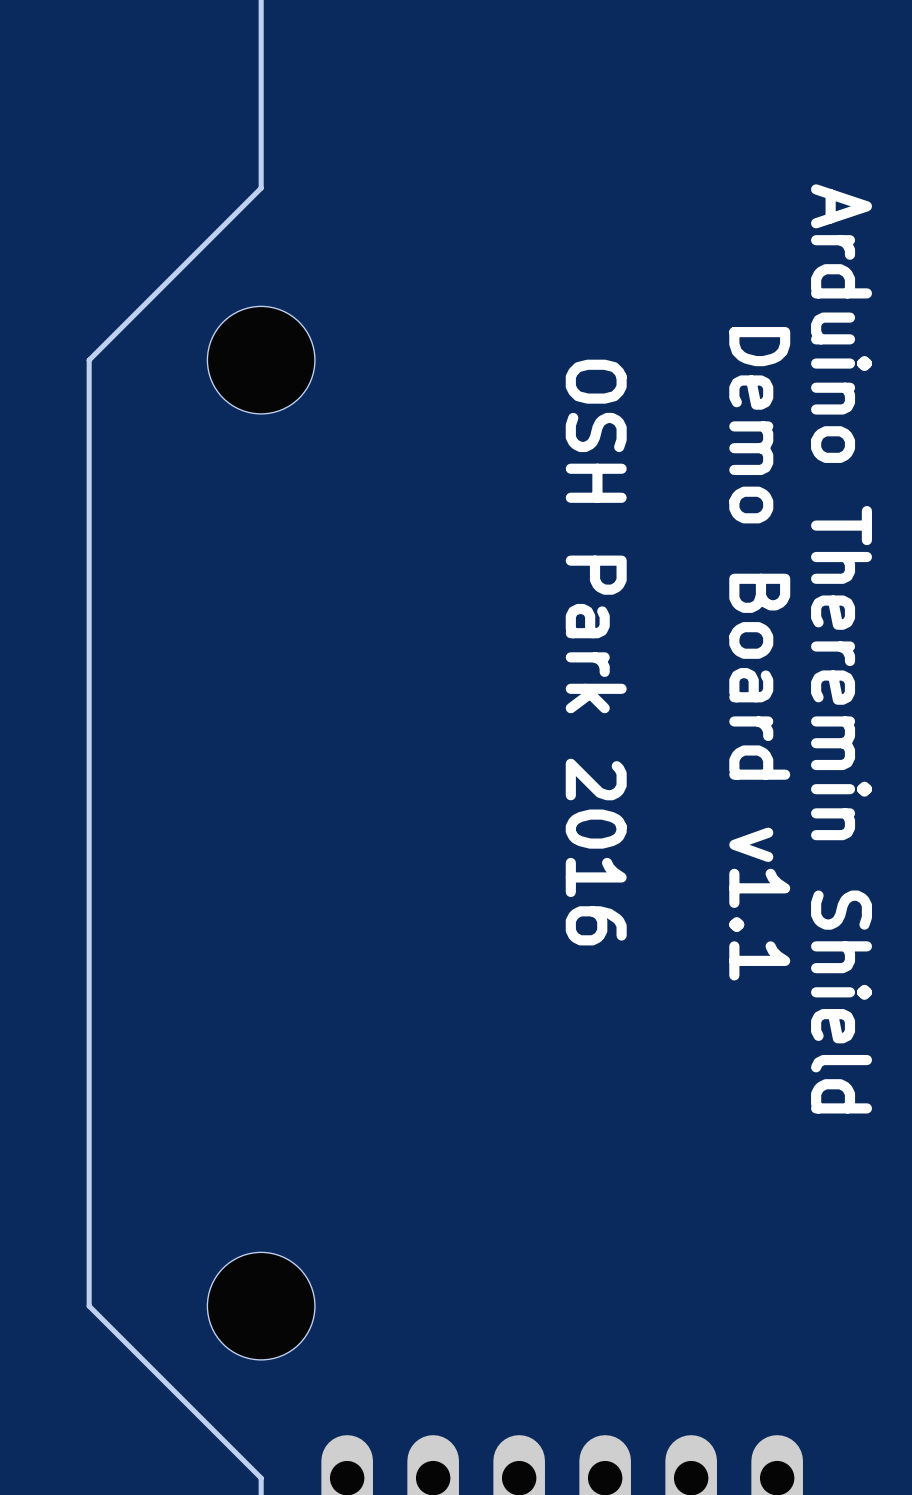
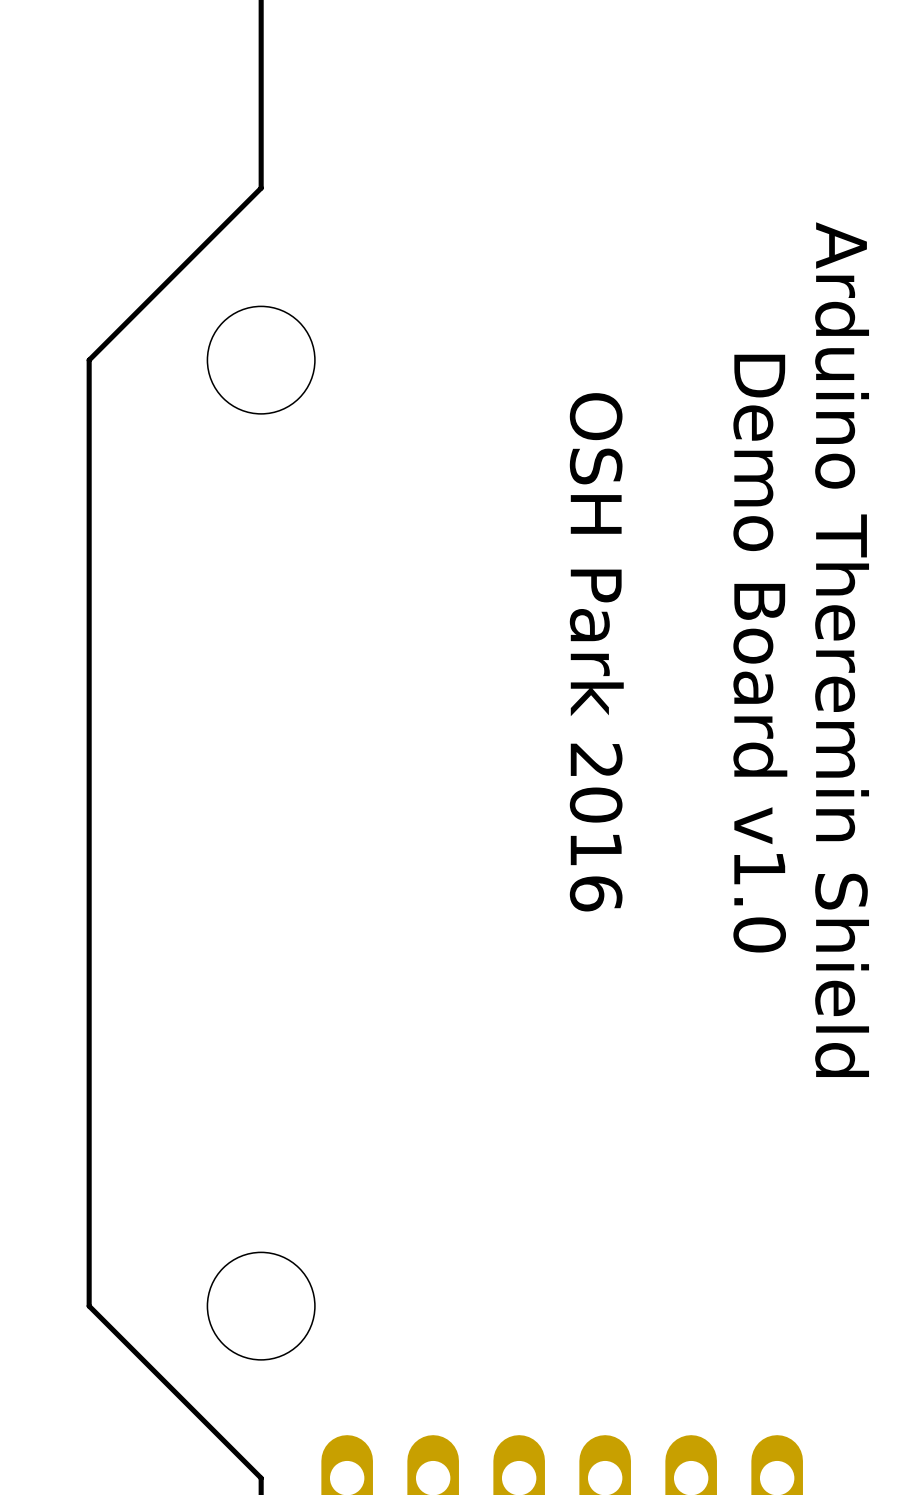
text: Demo Board v1.1 (759, 653) -> Demo Board v1.0 (760, 653)

